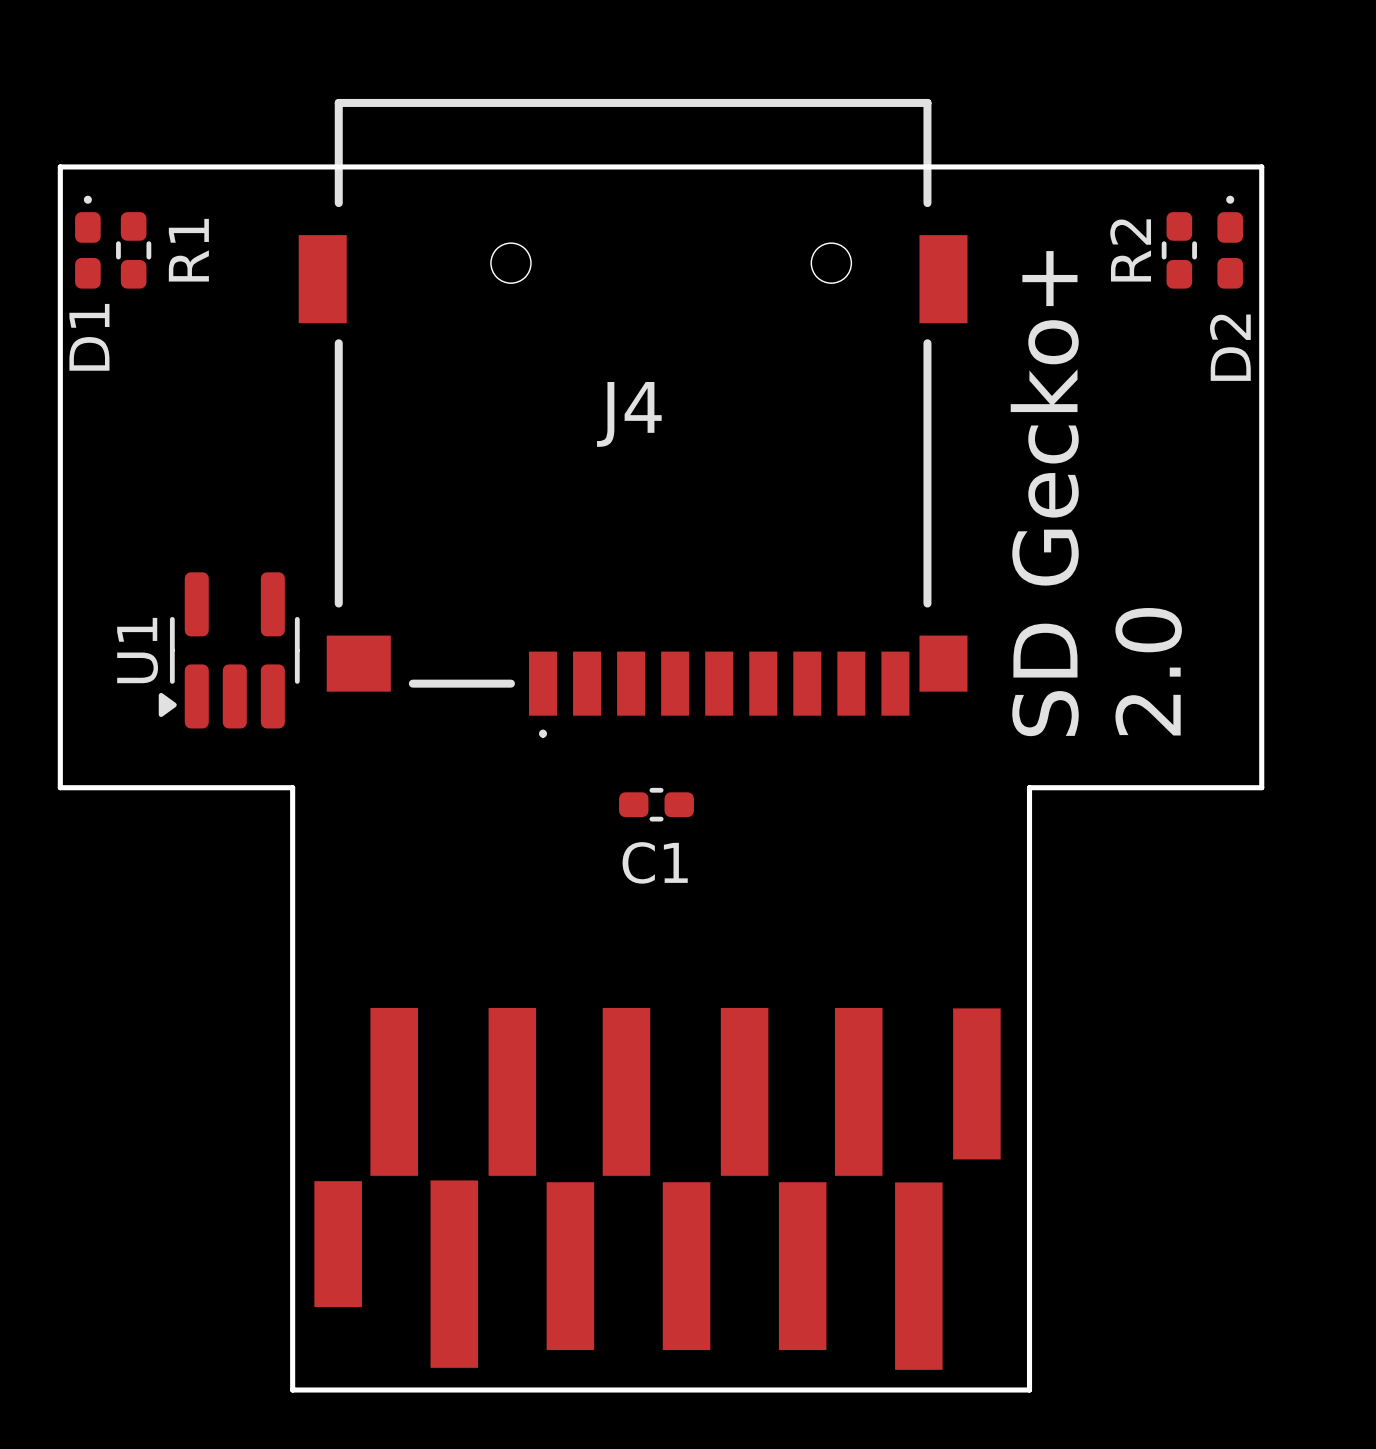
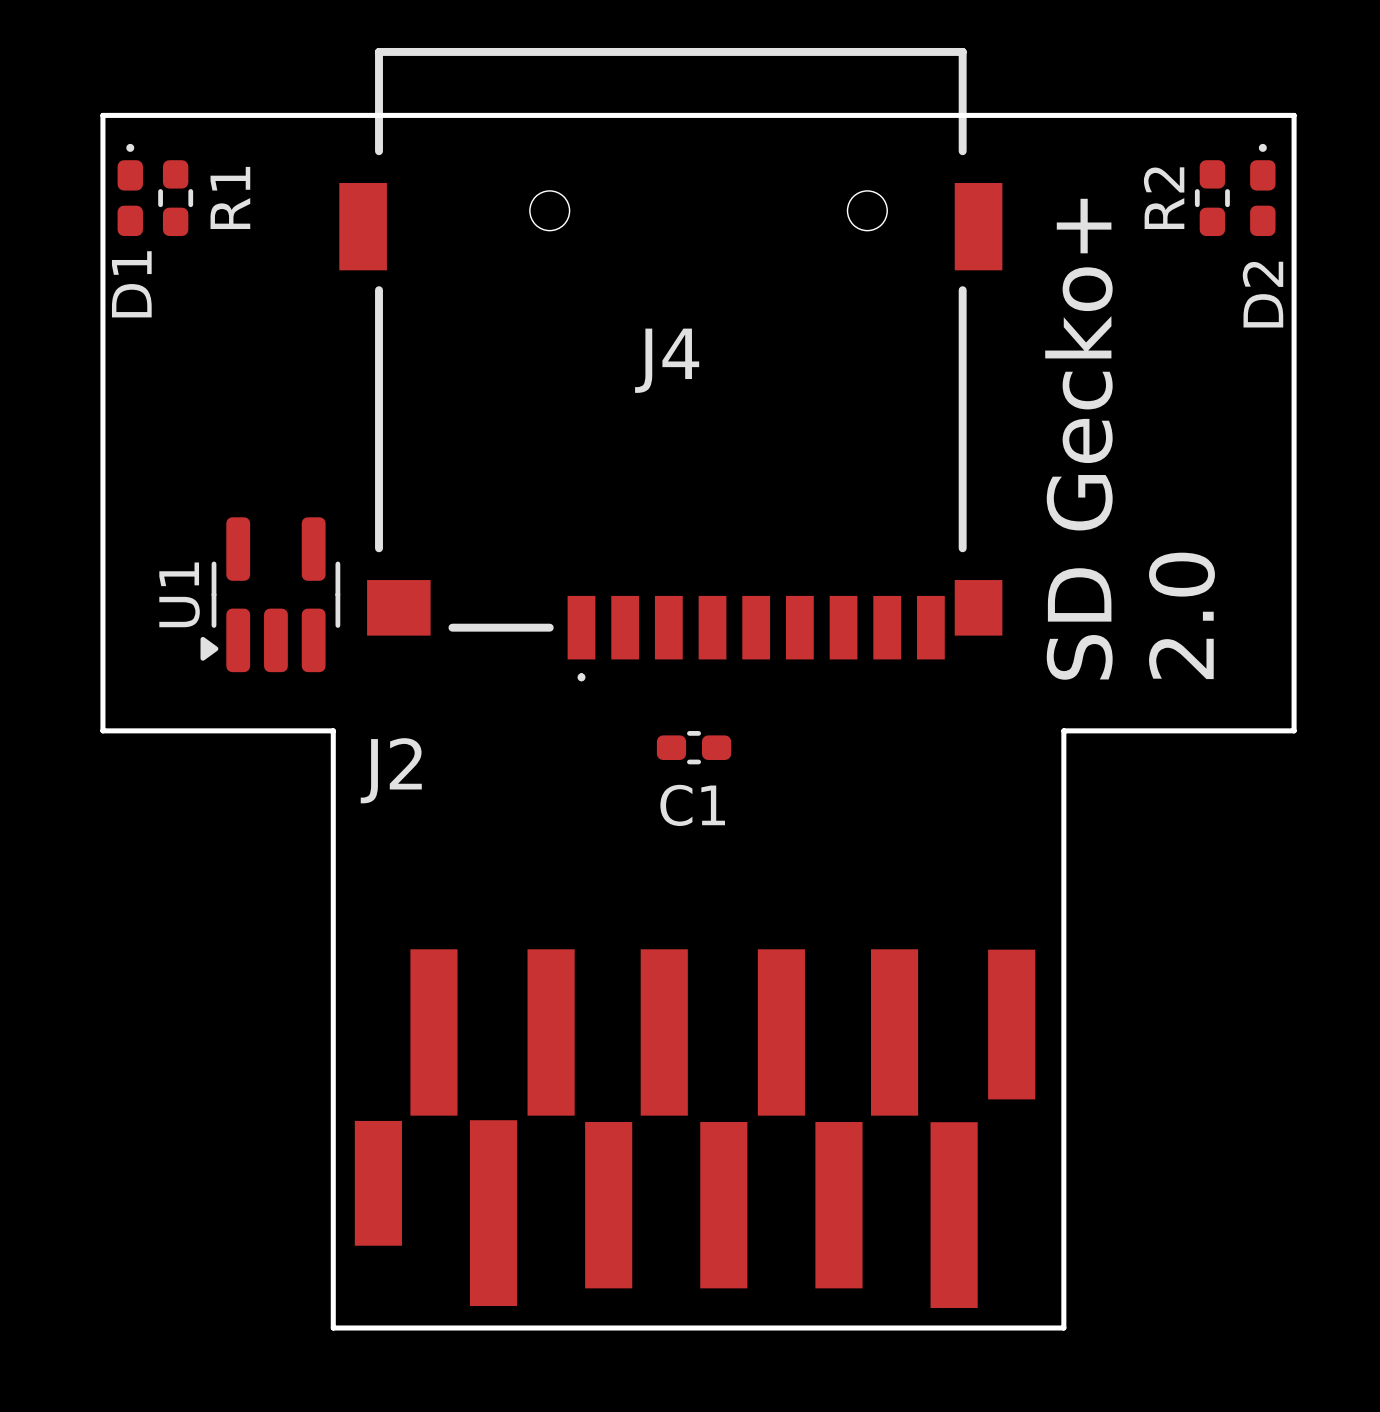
J2 name: none -> J2 (391, 770)

